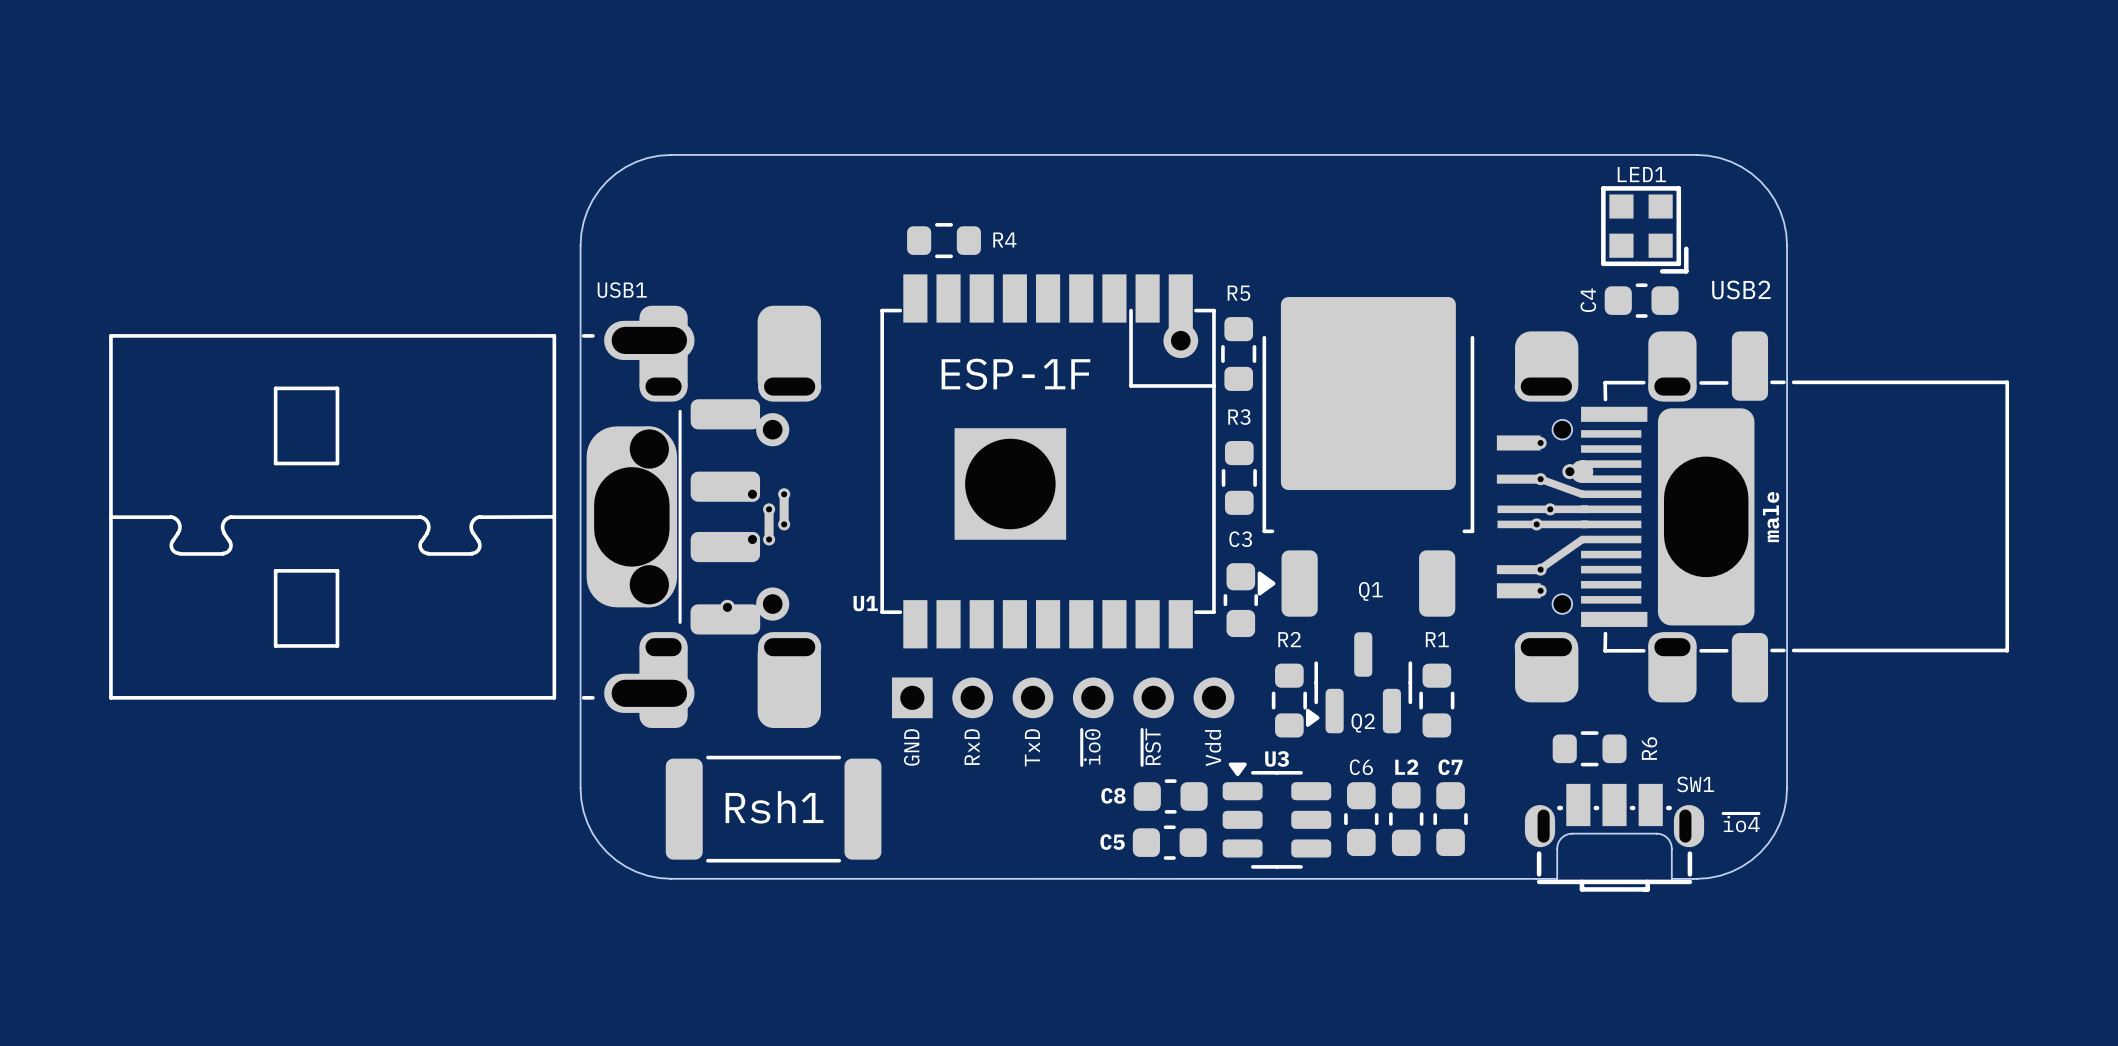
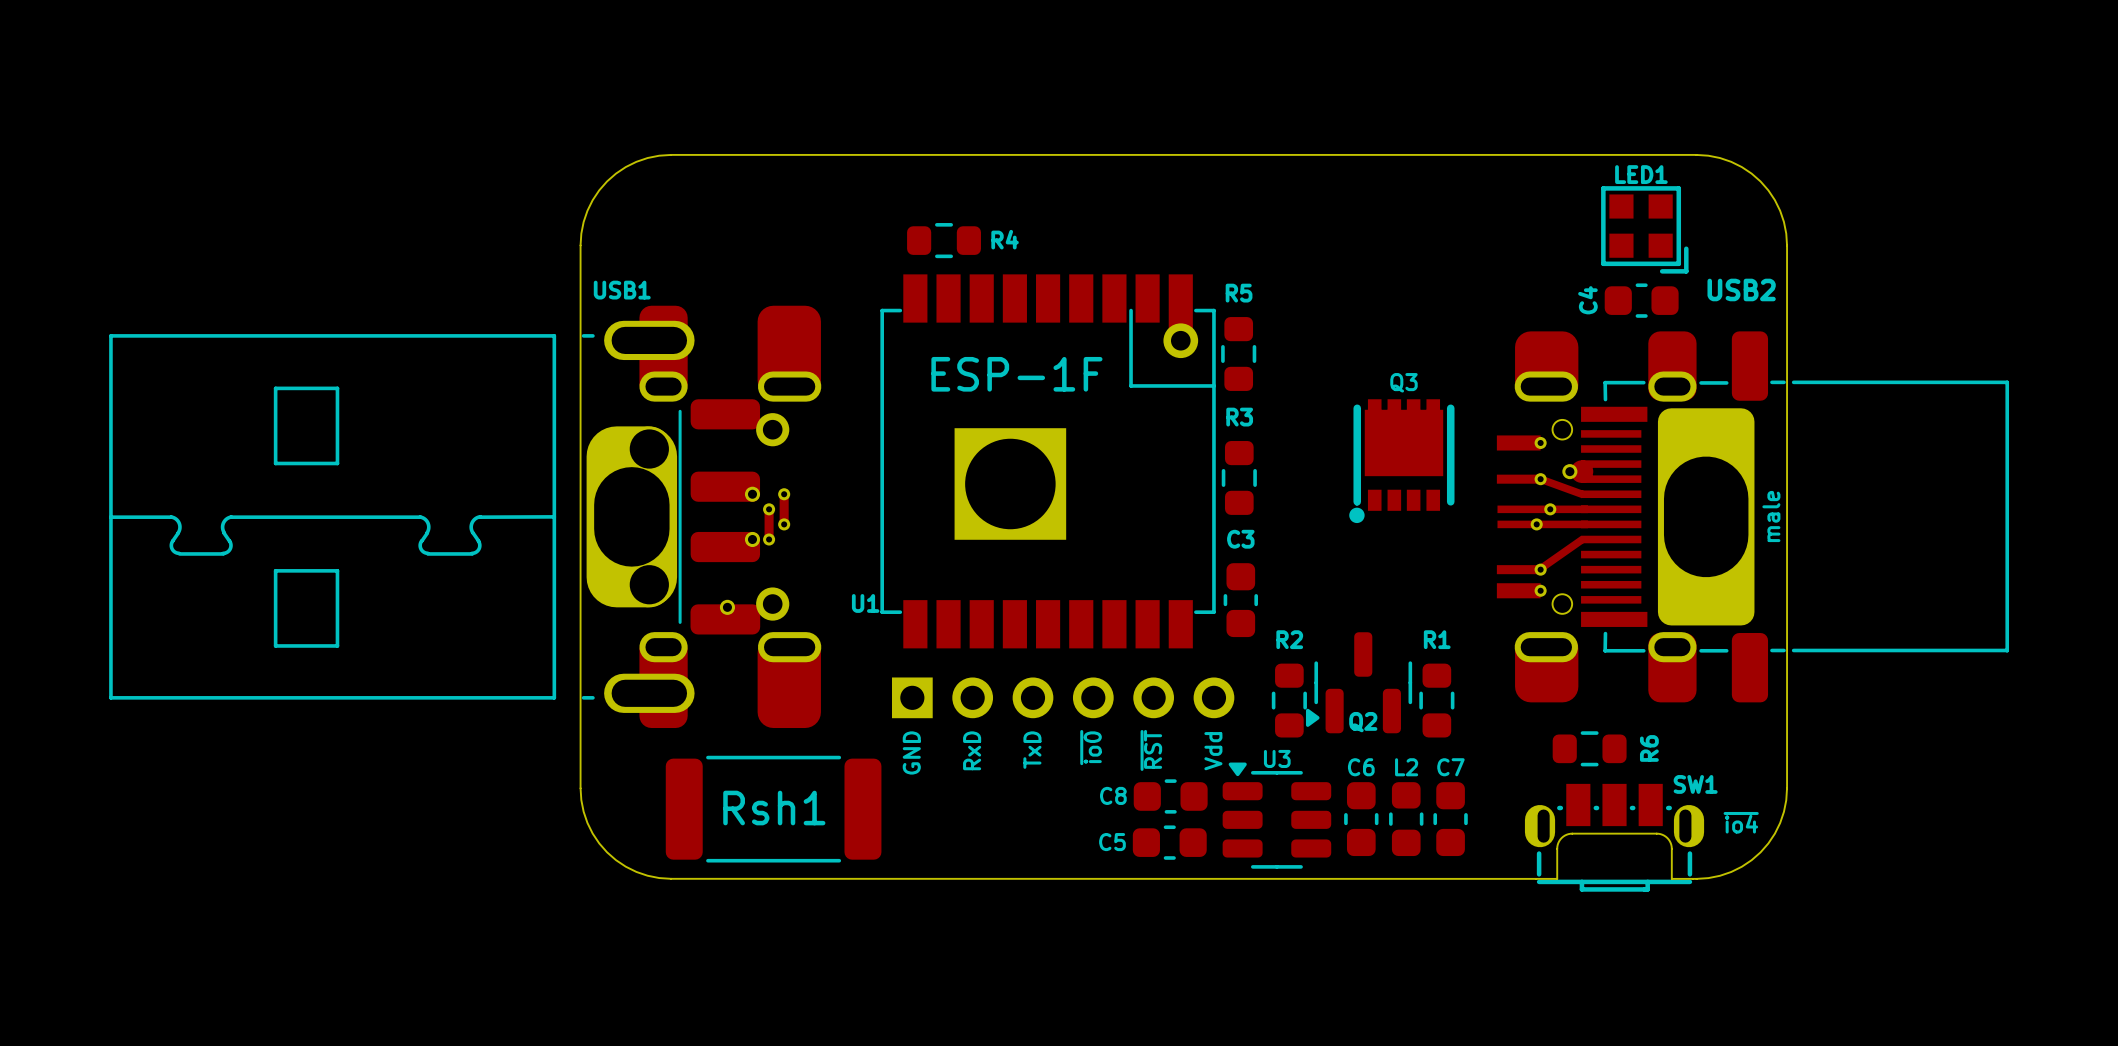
Q1: (1365, 456) -> none
Q3: none -> (1401, 461)

